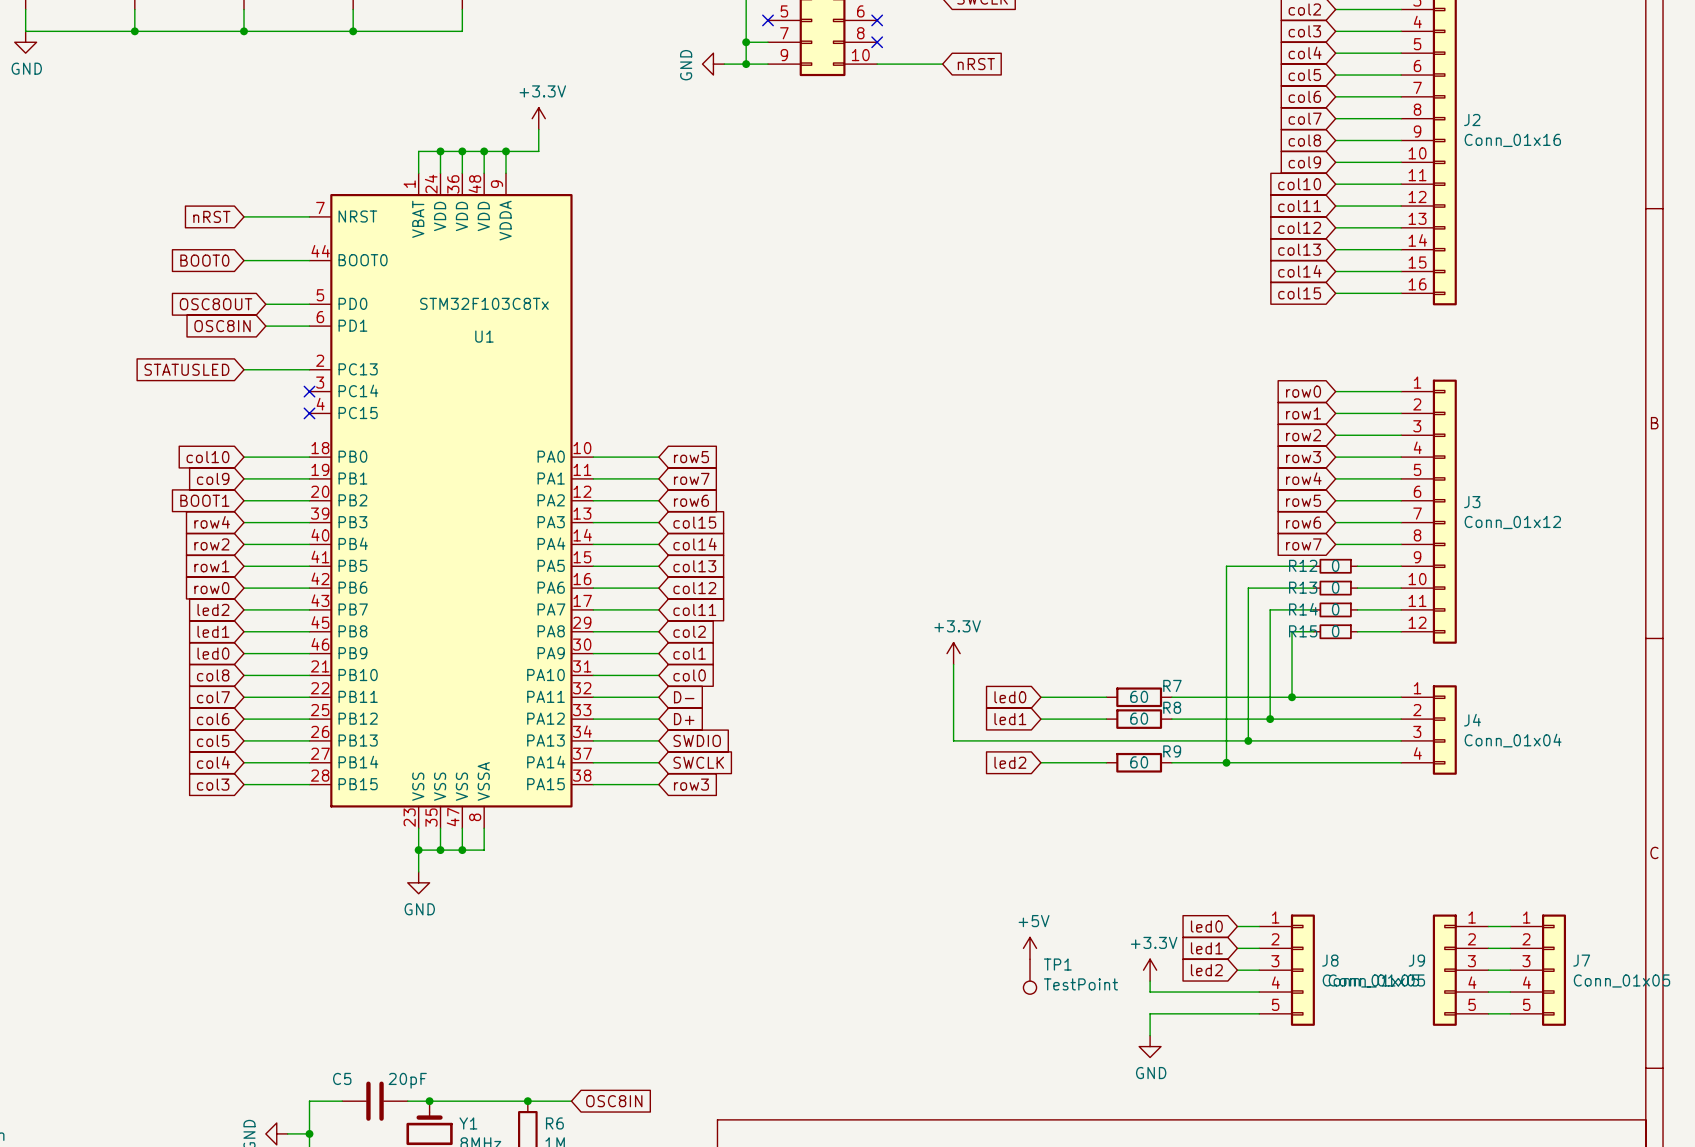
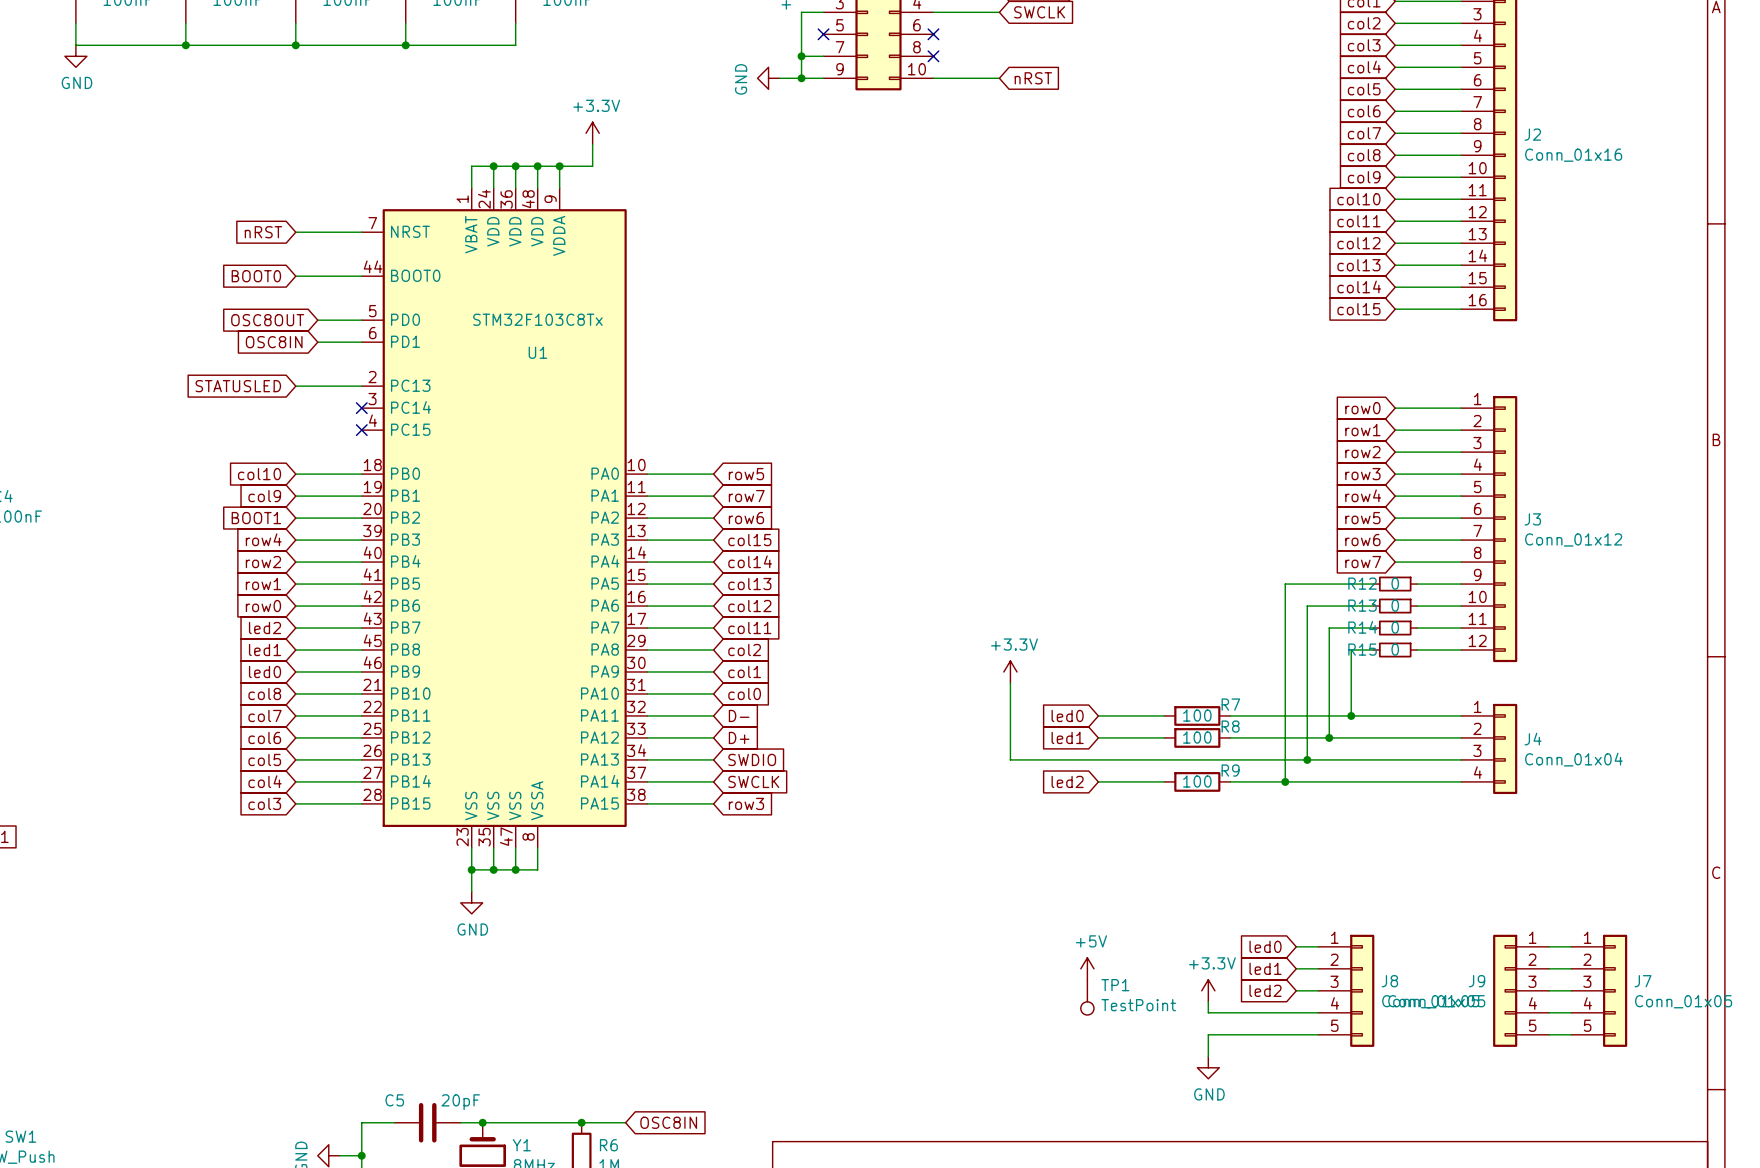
R7 value: 60 (1139, 696) -> 100 (1197, 715)
R8 value: 60 (1139, 718) -> 100 (1197, 737)
R9 value: 60 (1139, 762) -> 100 (1197, 781)

